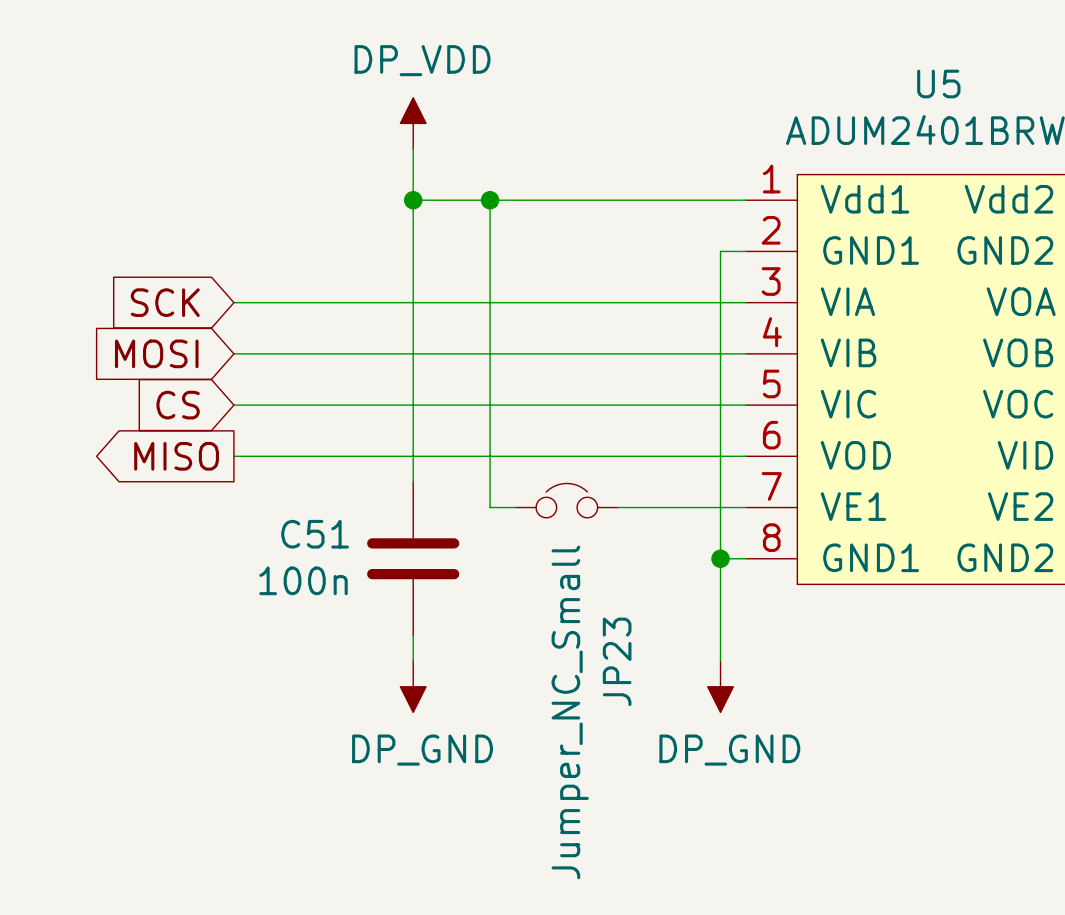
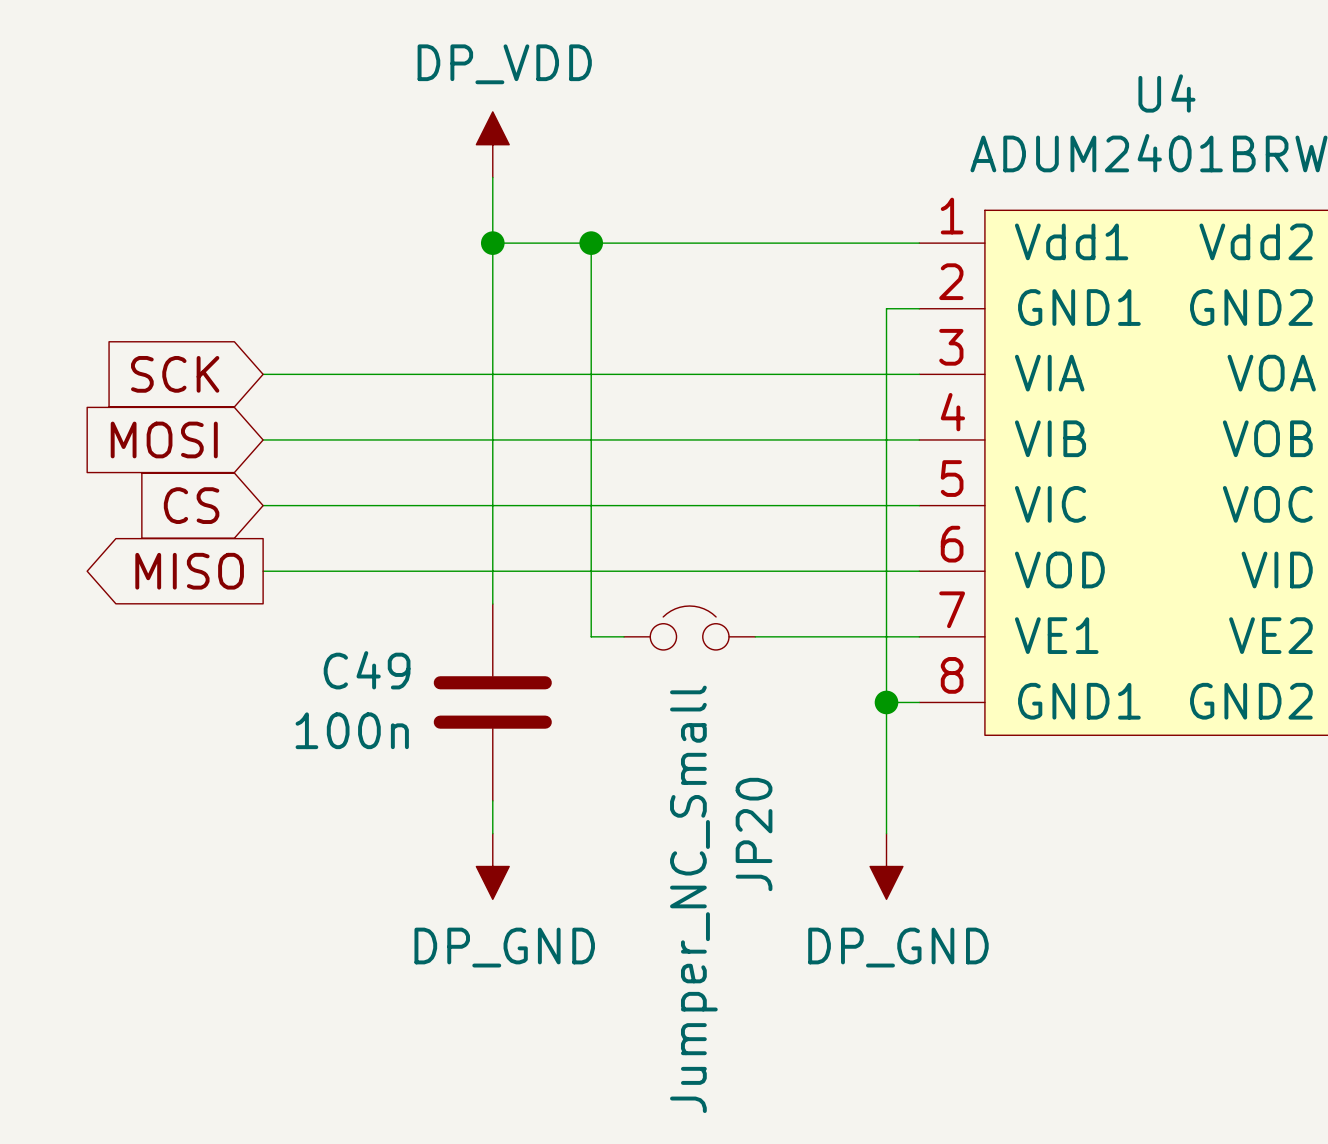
U5 name: U5 (938, 84) -> U4 (1166, 93)
C51 name: C51 (315, 534) -> C49 (367, 670)
JP23 name: JP23 (617, 661) -> JP20 (754, 834)

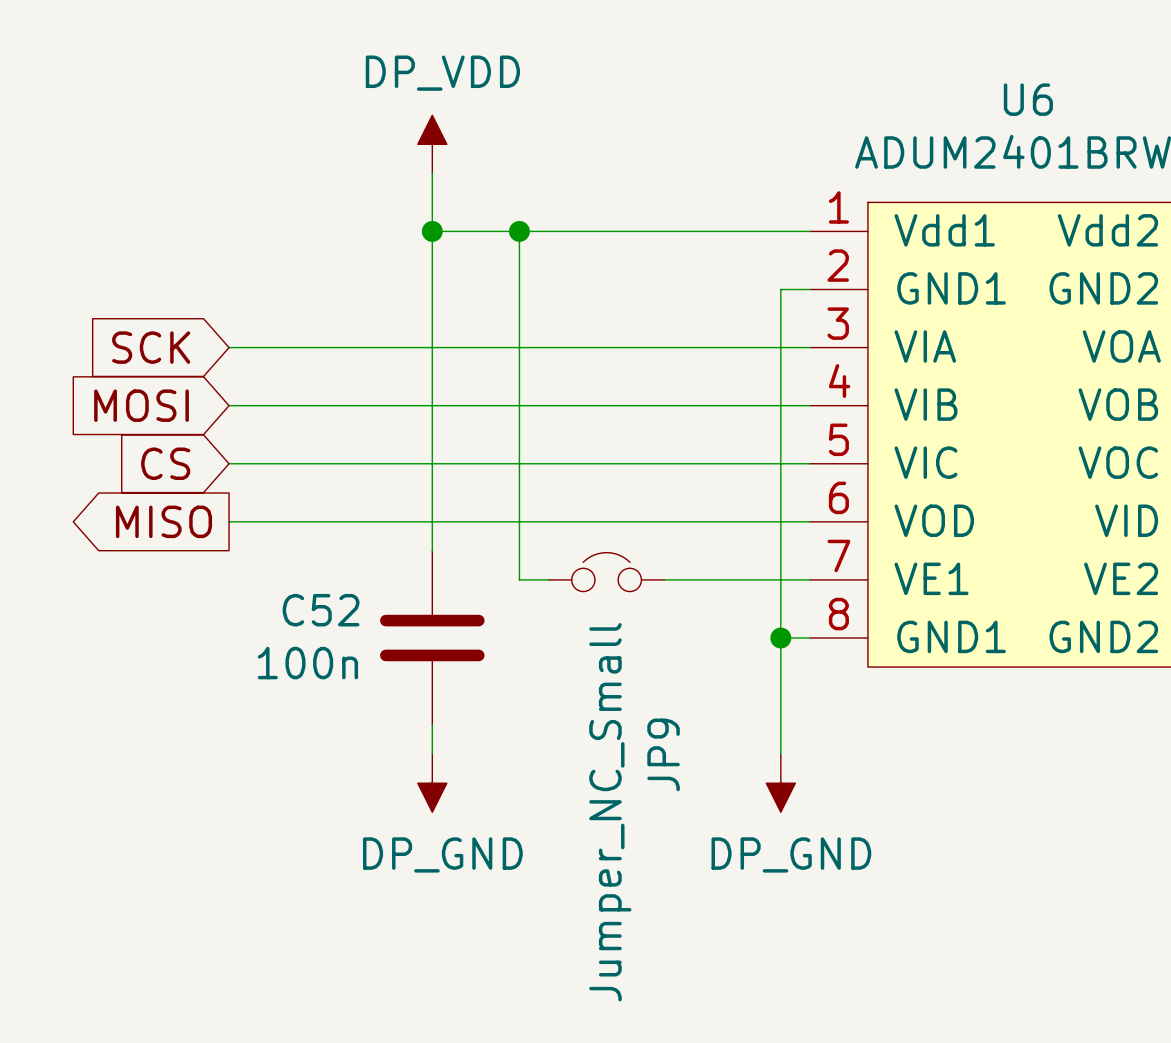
U4 name: U4 (1166, 93) -> U6 (1028, 99)
C49 name: C49 (367, 670) -> C52 (321, 610)
JP20 name: JP20 (754, 834) -> JP9 (663, 754)

